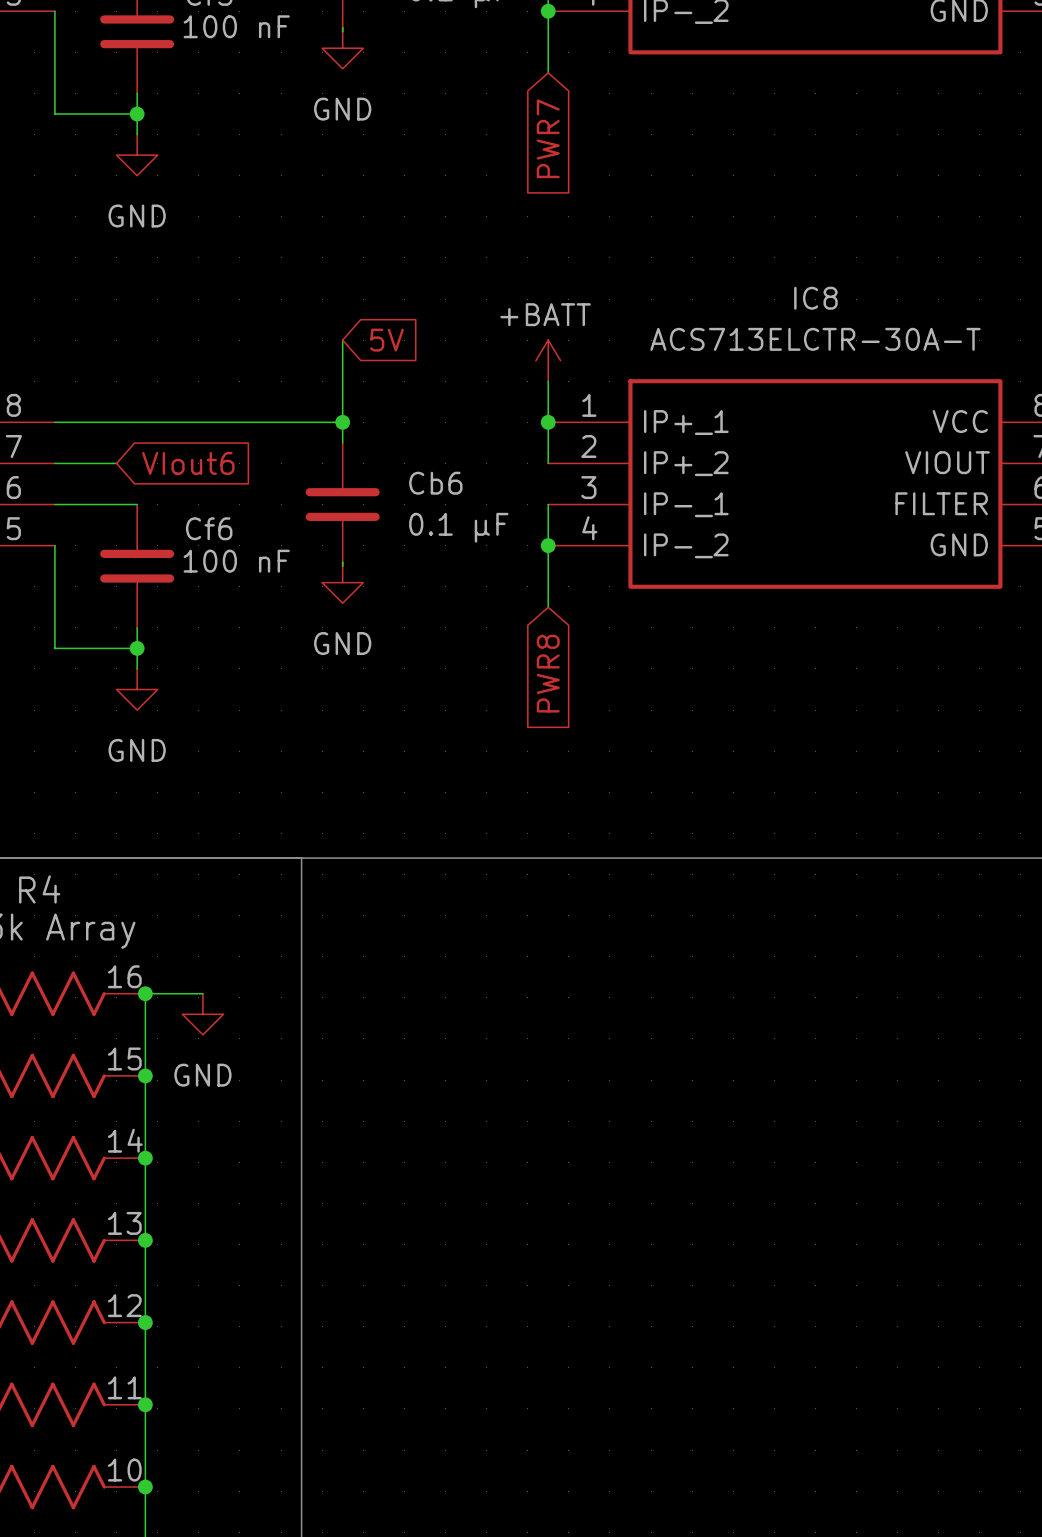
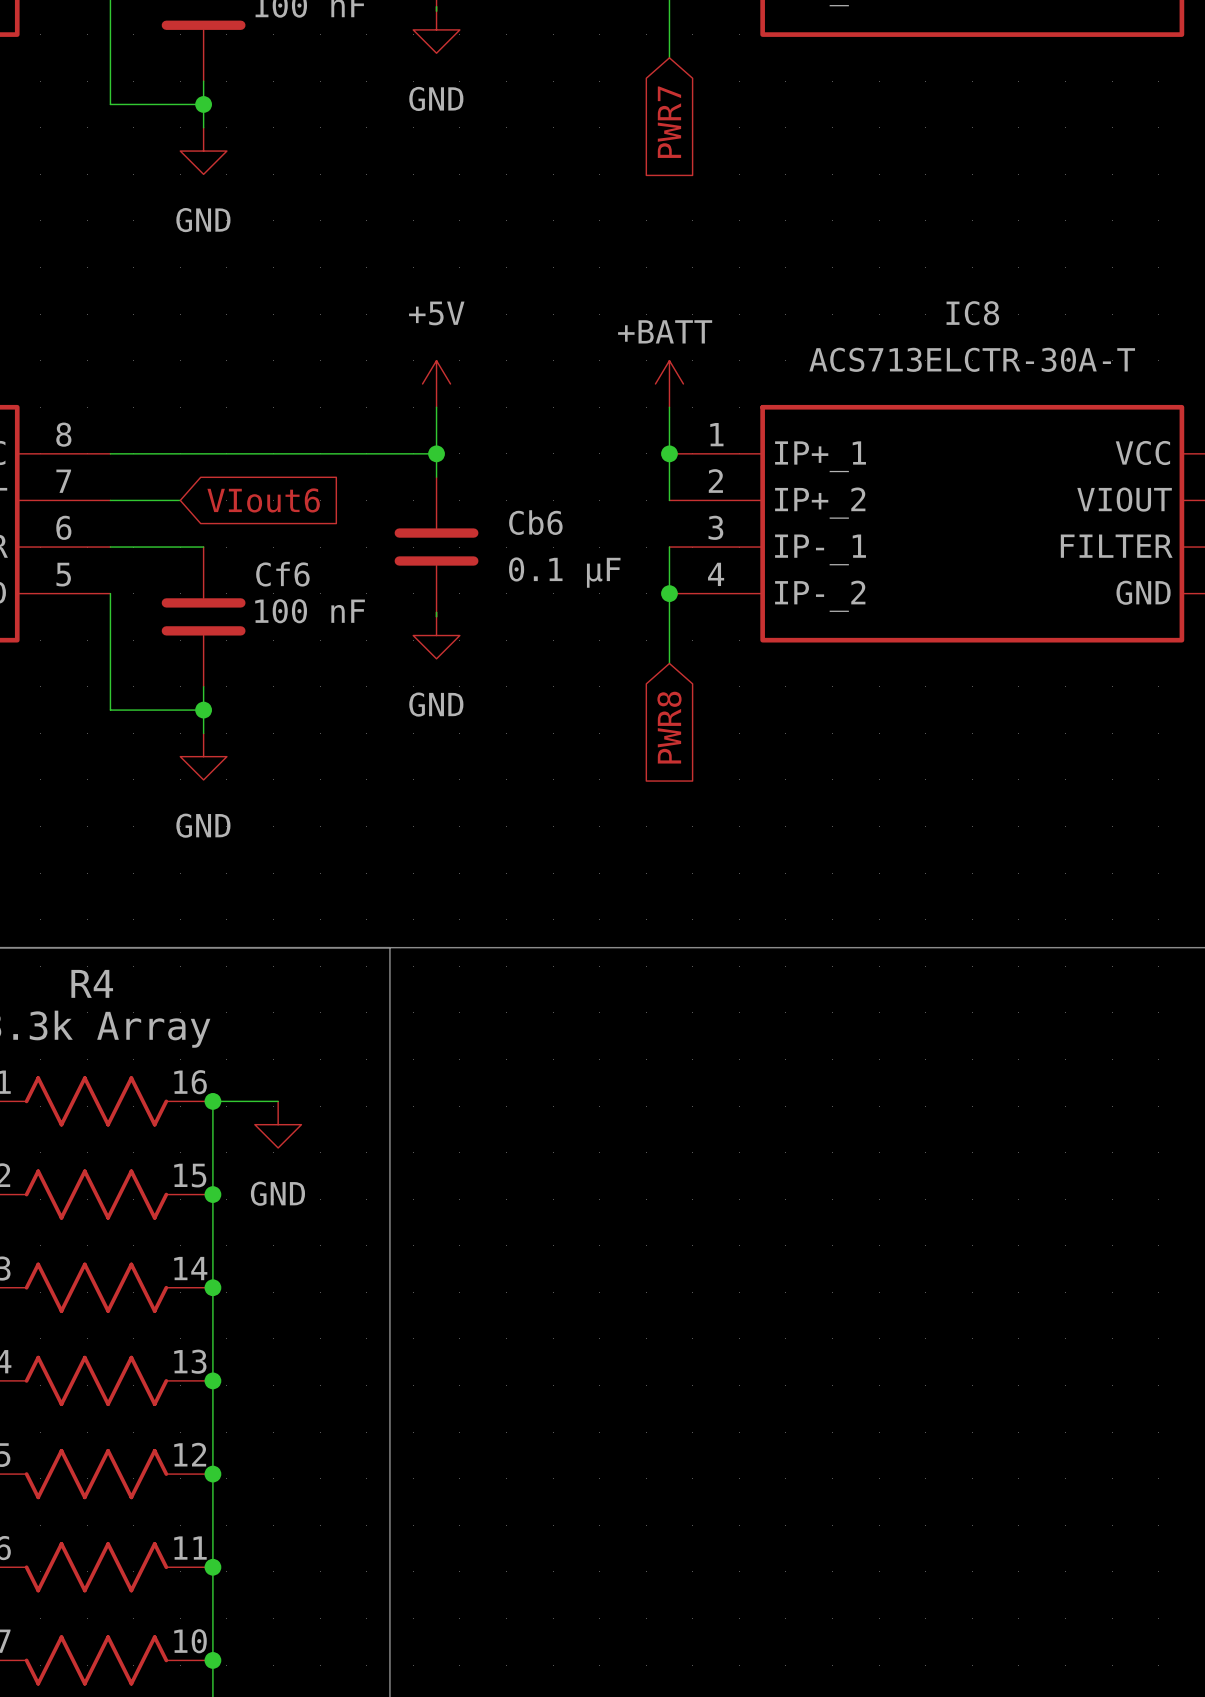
global label: 5V (387, 340) -> none
power symbol: none -> +5V (436, 383)

